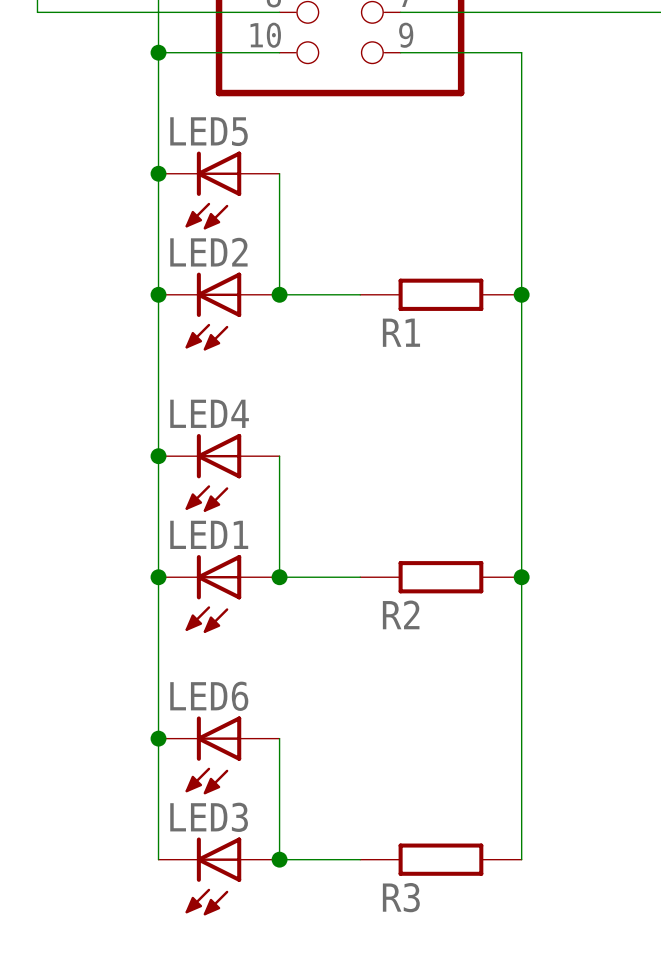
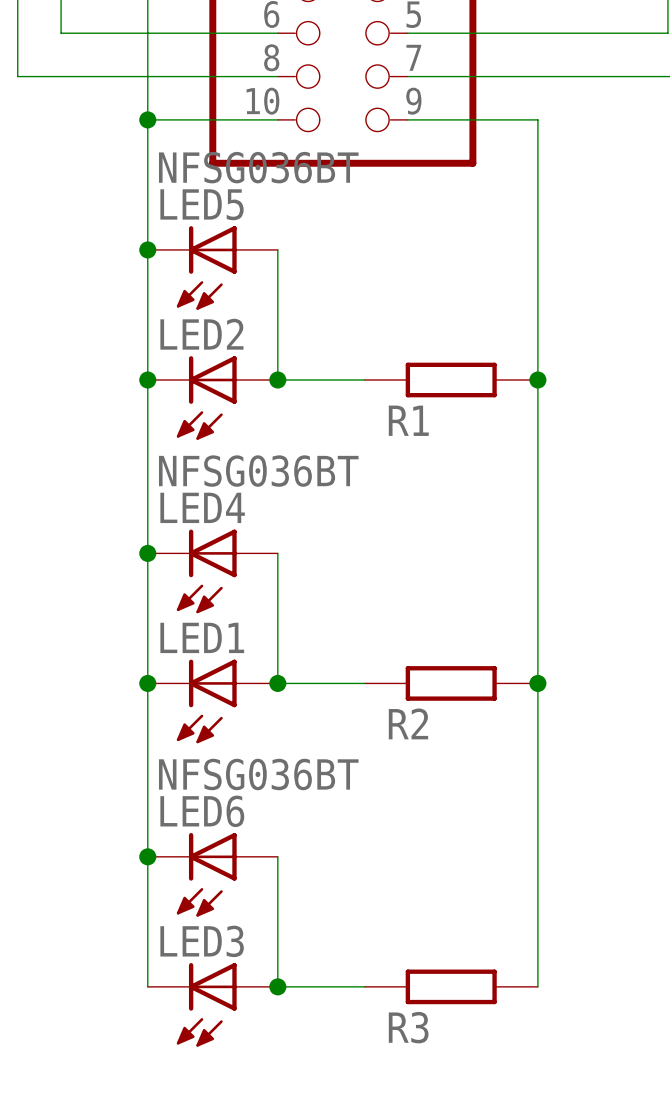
LED5 value: none -> NFSG036BT (258, 167)
LED4 value: none -> NFSG036BT (258, 471)
LED6 value: none -> NFSG036BT (258, 774)

